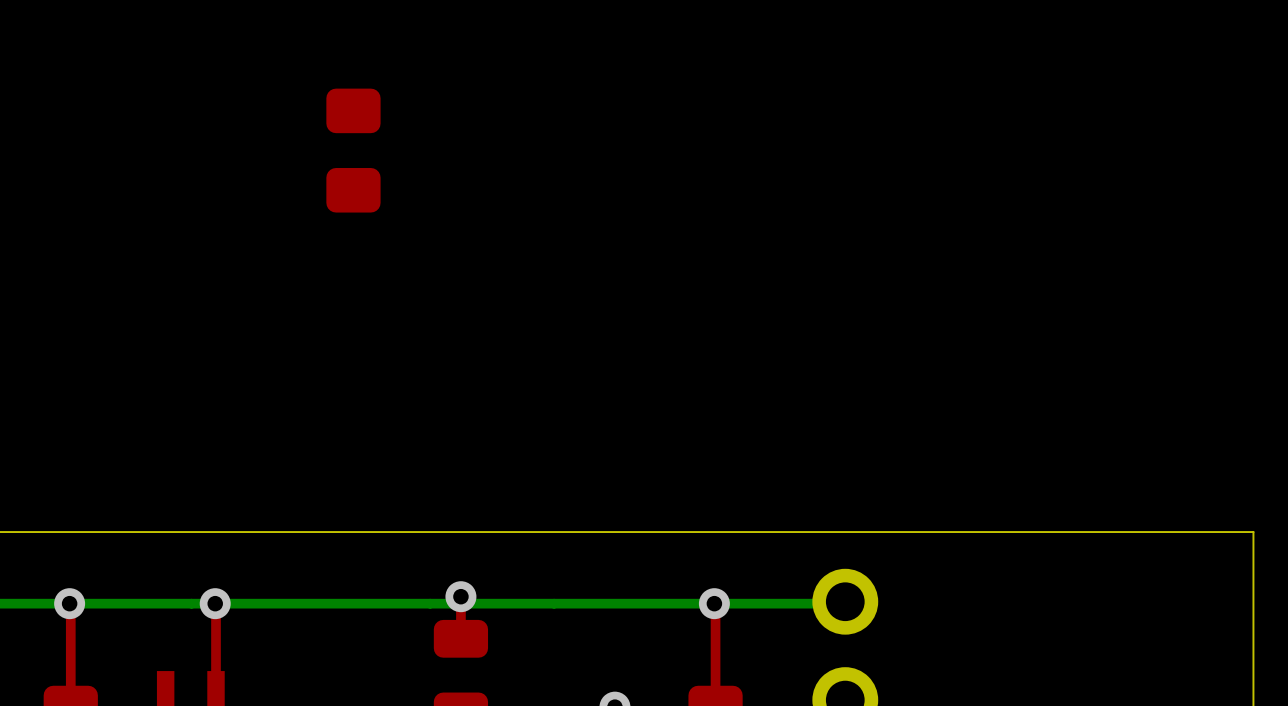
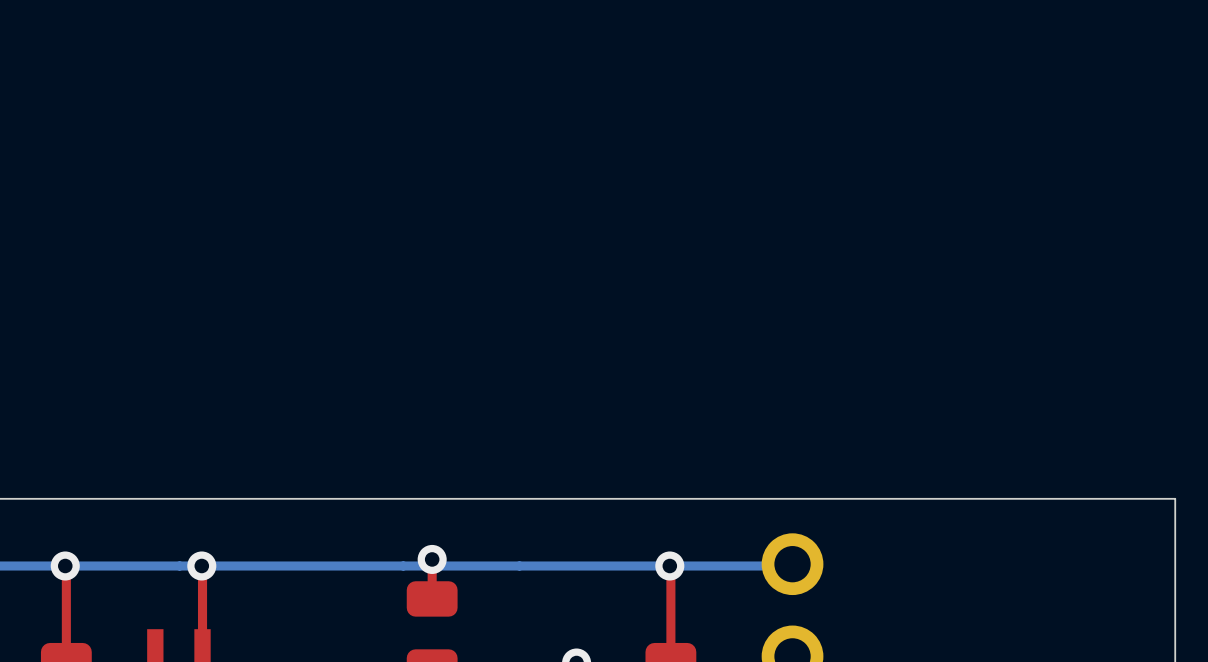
part: (353, 150) -> none

